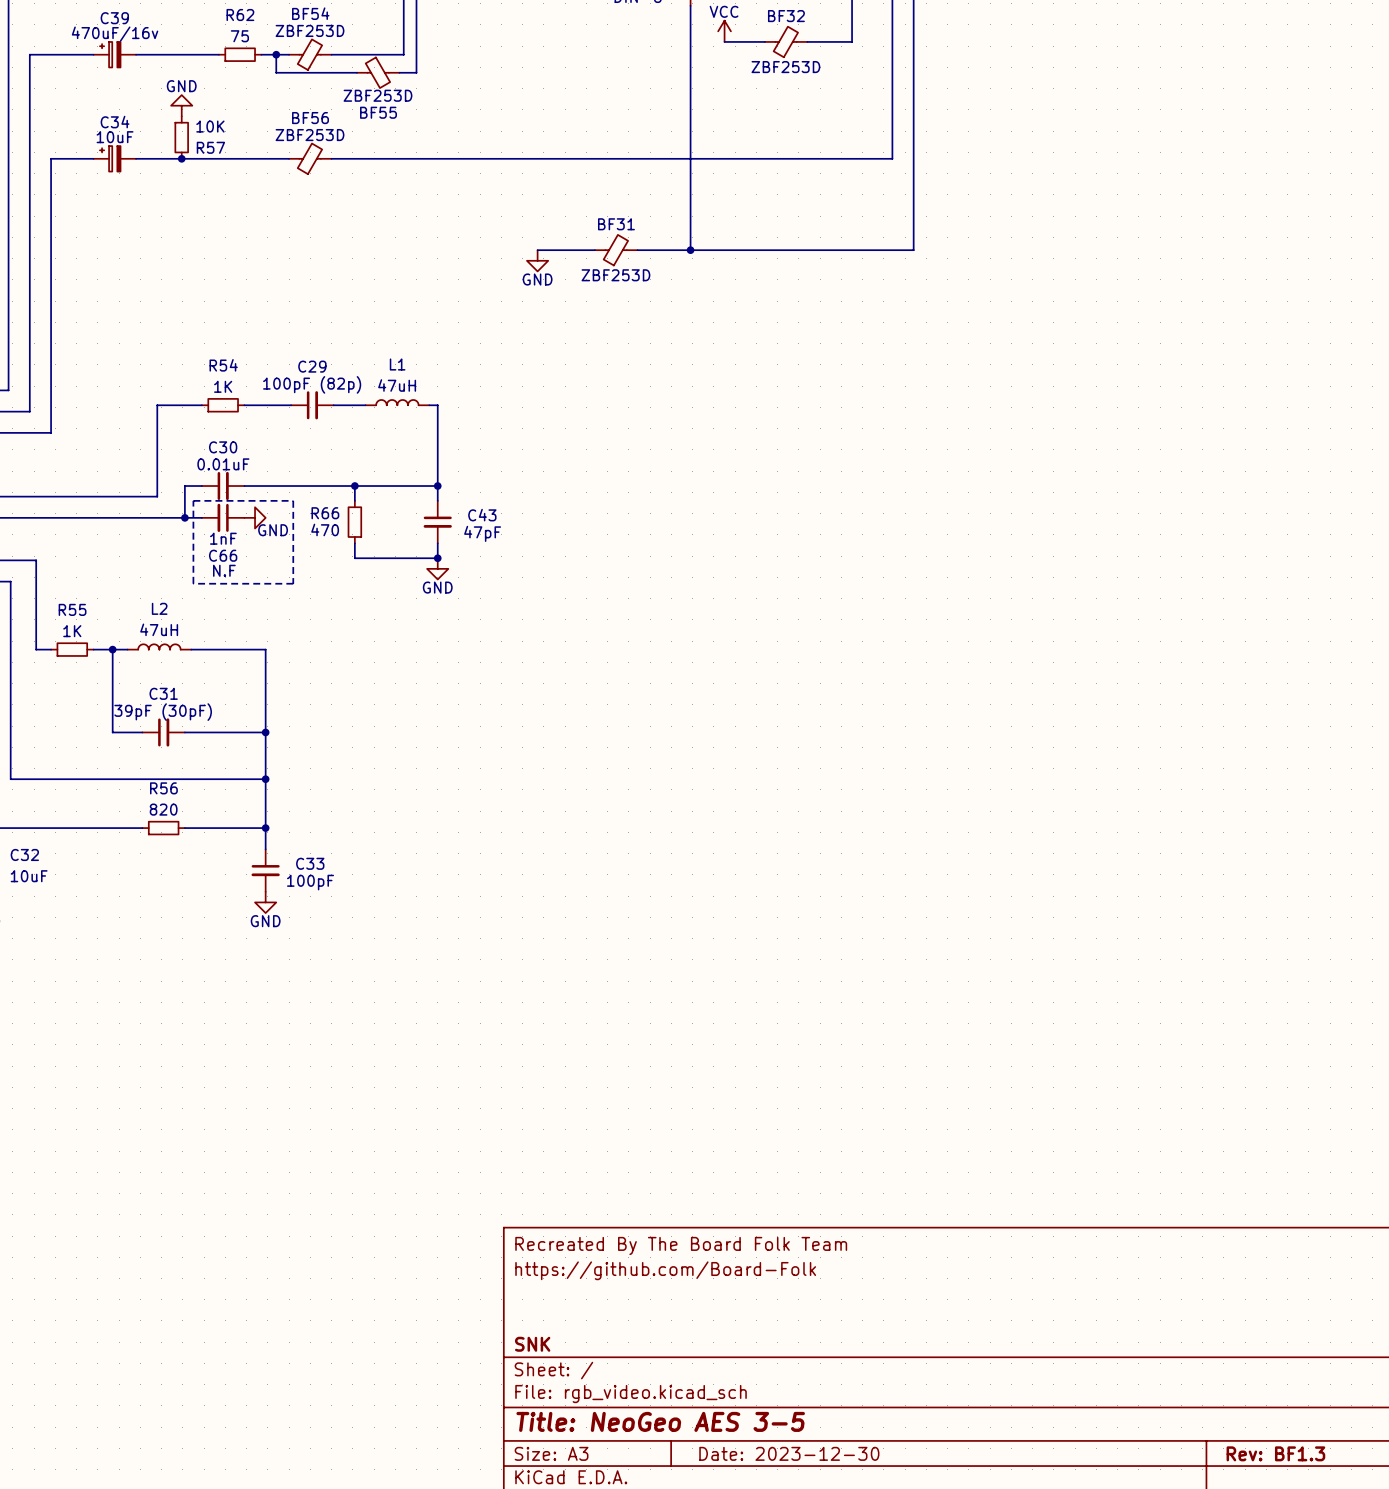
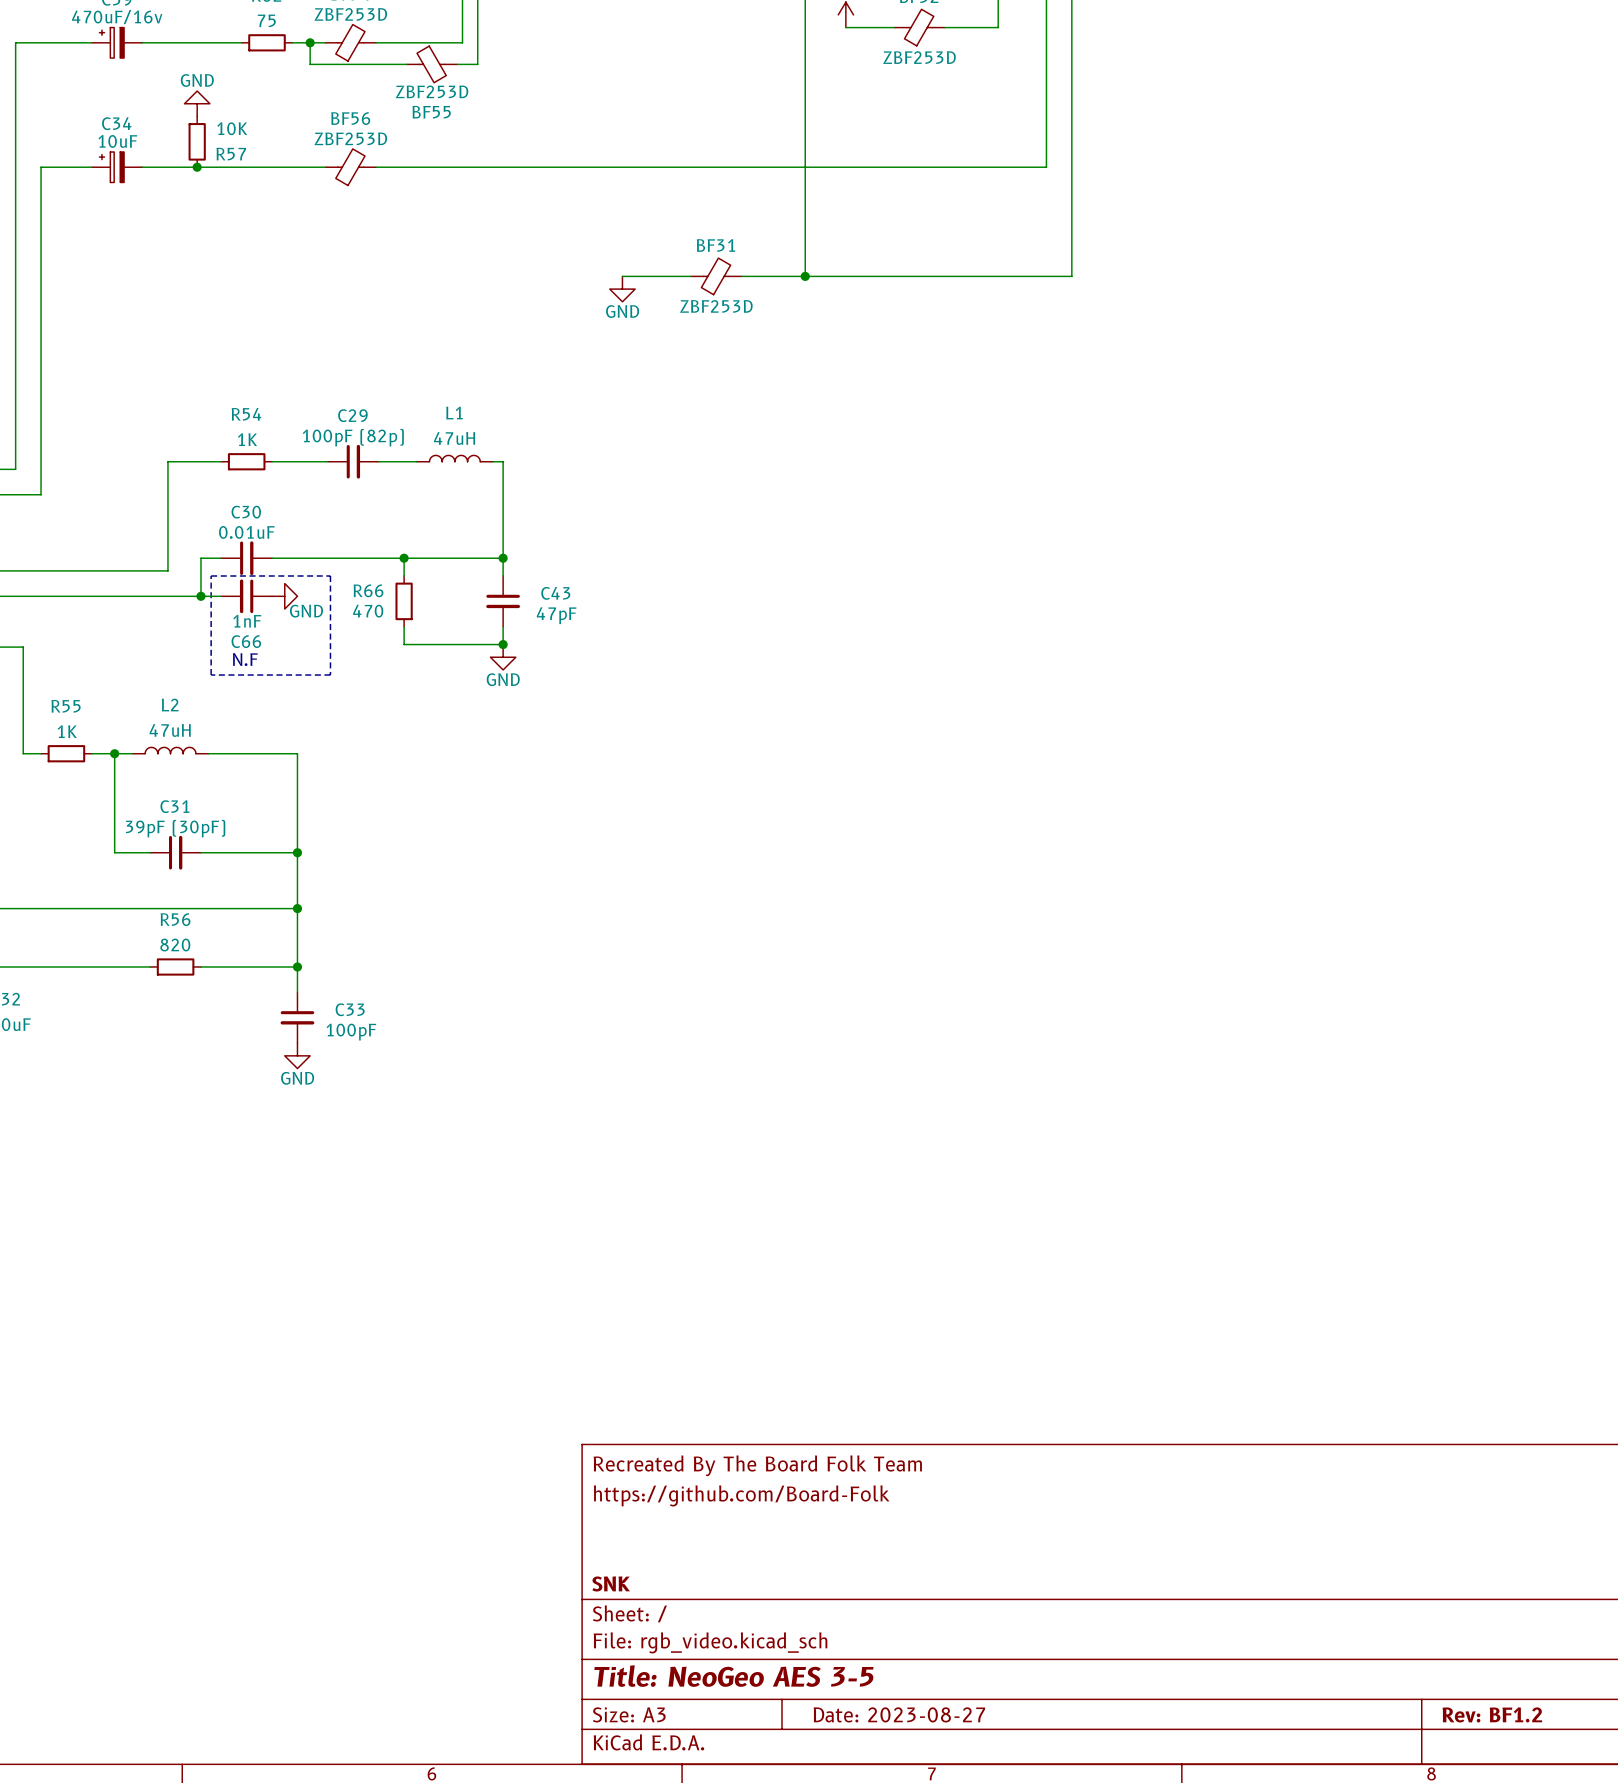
title block: Date: 2023-12-30 (789, 1453) -> Date: 2023-08-27 (899, 1714)
title block: Rev: BF1.3 (1275, 1453) -> Rev: BF1.2 (1492, 1714)

